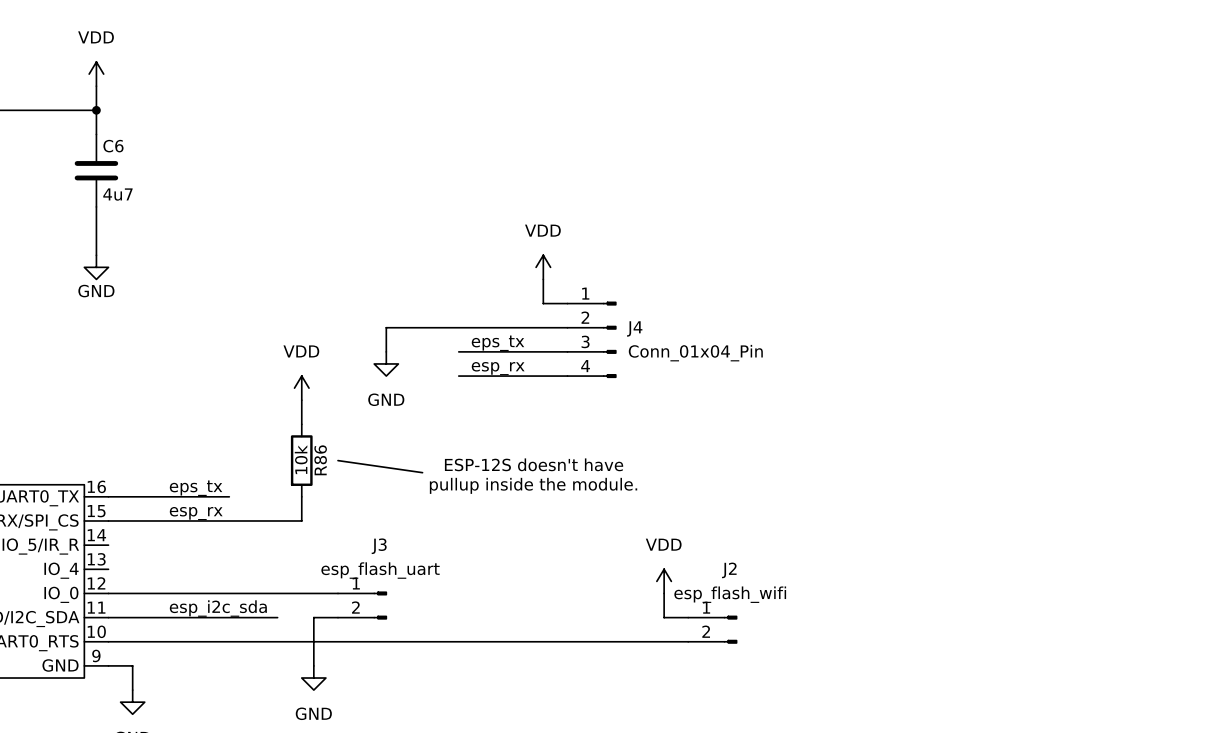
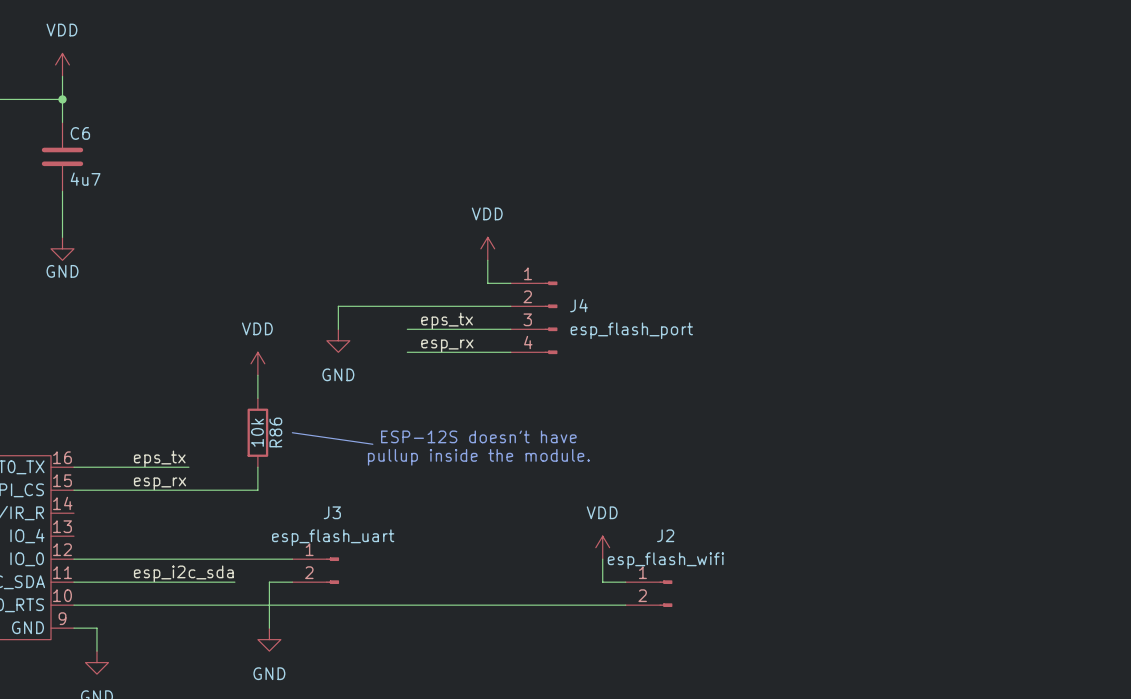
J4 value: Conn_01x04_Pin (695, 353) -> esp_flash_port (631, 330)

